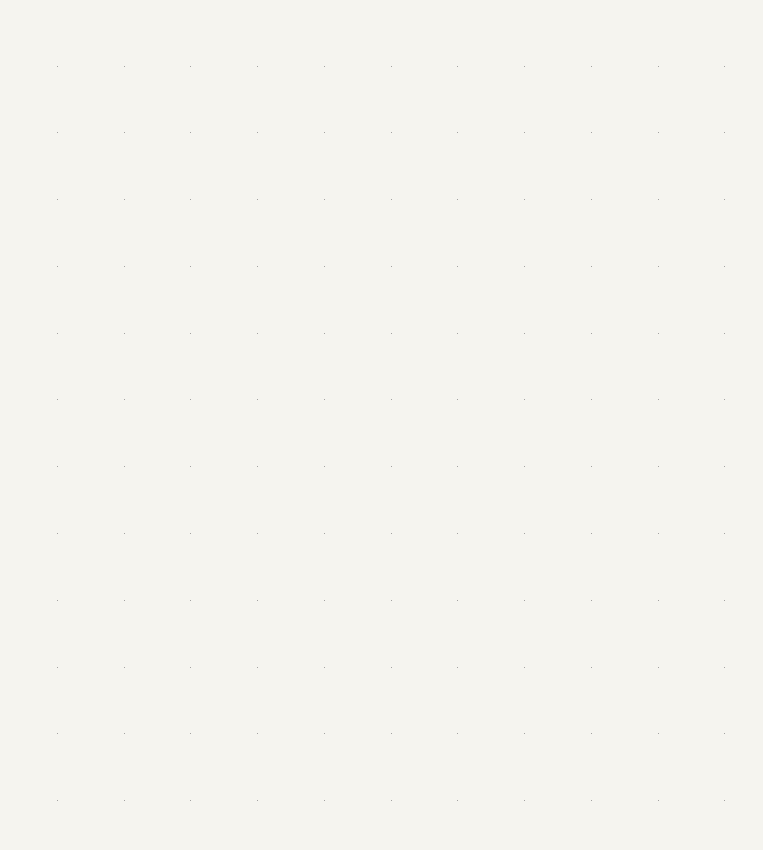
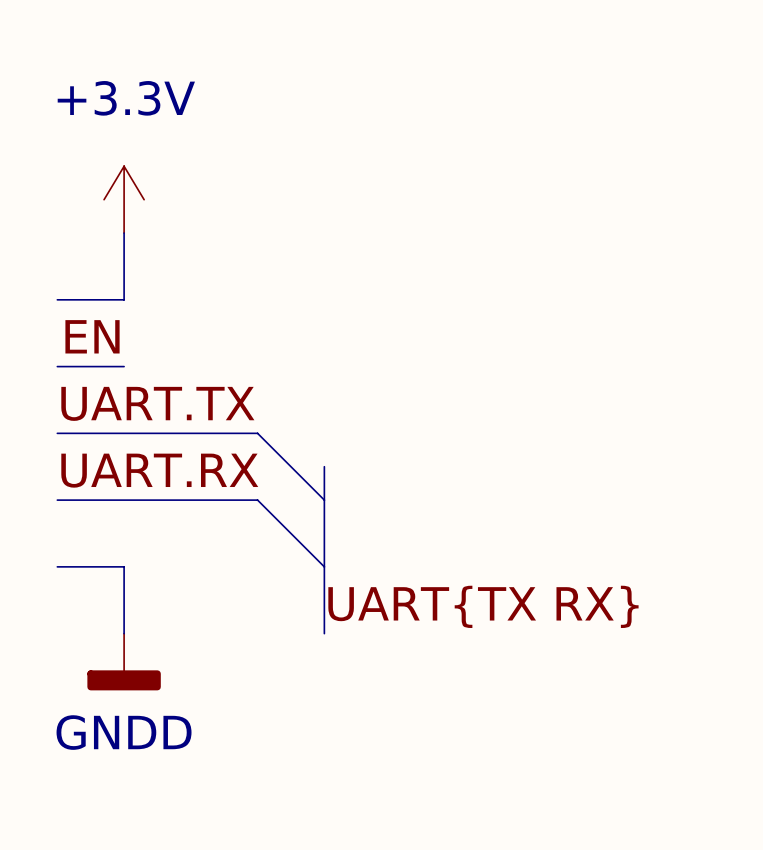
power symbol: none -> +3.3V (124, 199)
wire: none -> (124, 233) (124, 299) (57, 299)
label: none -> EN (92, 336)
wire: none -> (57, 366) (124, 366)
label: none -> UART.TX (157, 403)
wire: none -> (57, 433) (257, 433) (324, 500)
bus: none -> (324, 466) (324, 633)
label: none -> UART.RX (159, 470)
wire: none -> (57, 500) (257, 500) (324, 566)
wire: none -> (57, 566) (124, 566) (124, 633)
label: none -> UART{TX RX} (483, 606)
power symbol: none -> GNDD (124, 662)

